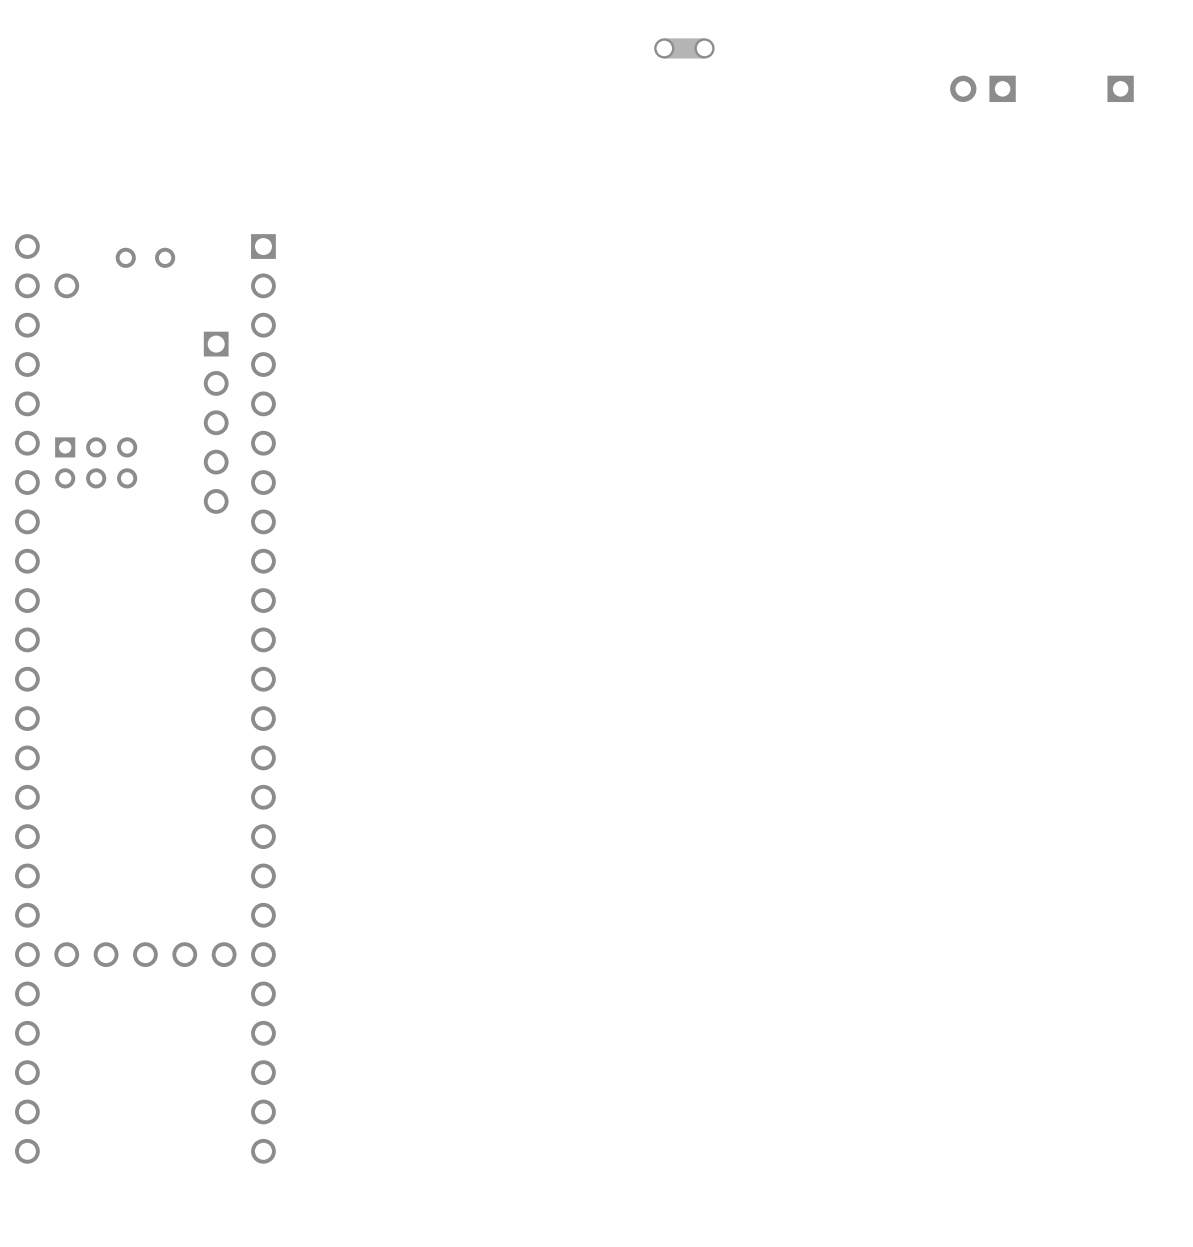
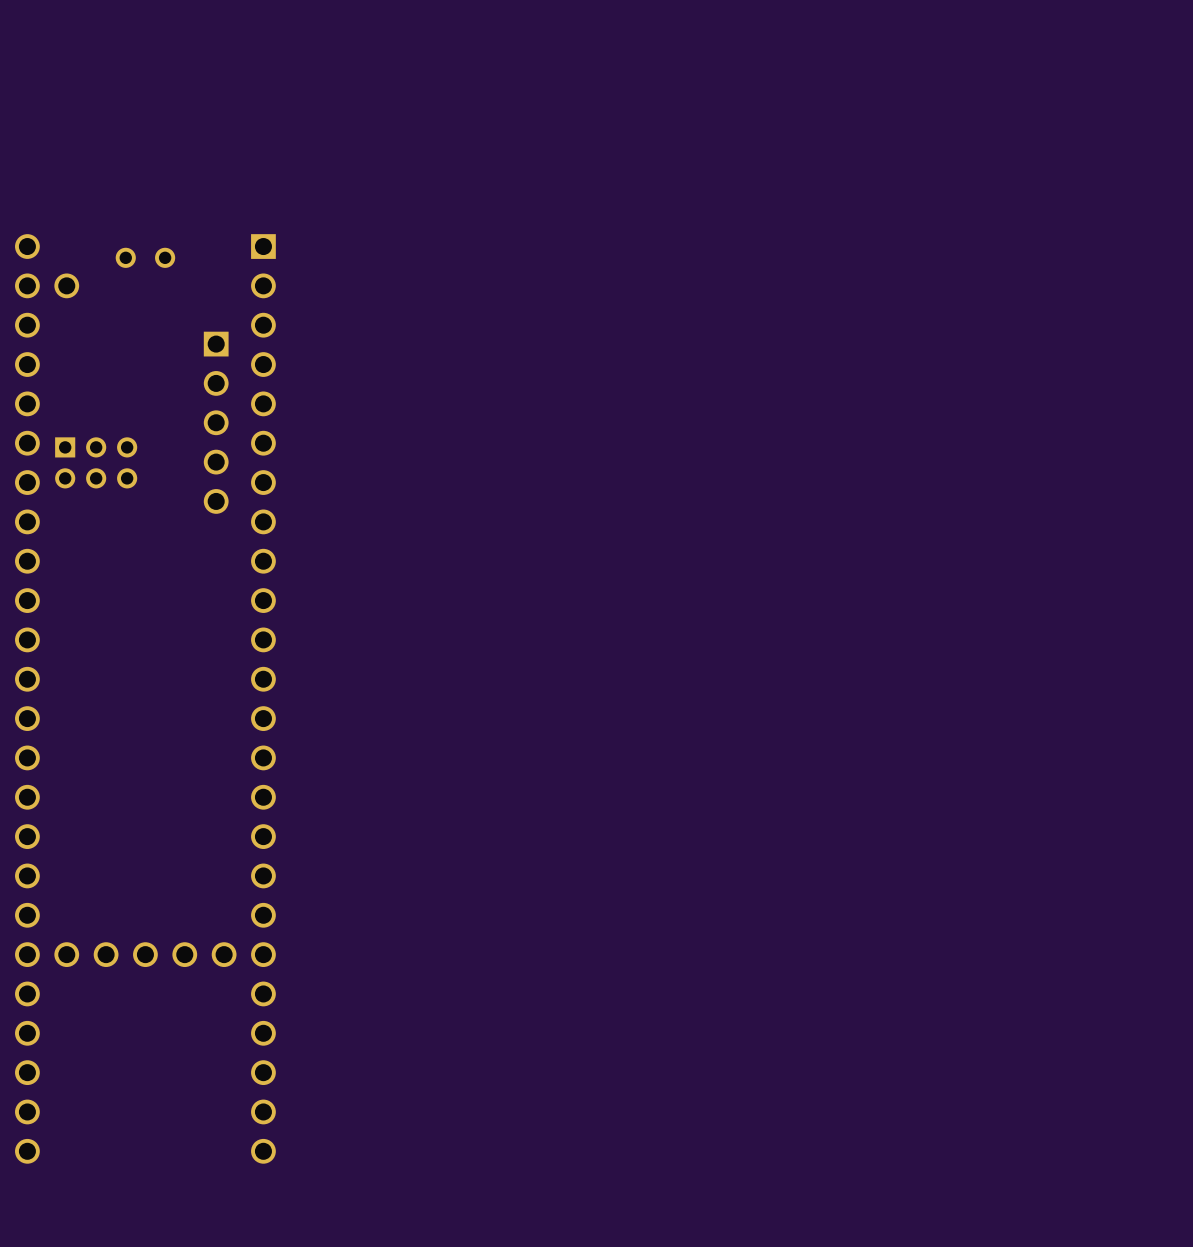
part: (684, 48) -> none
part: (982, 88) -> none
part: (1120, 88) -> none

